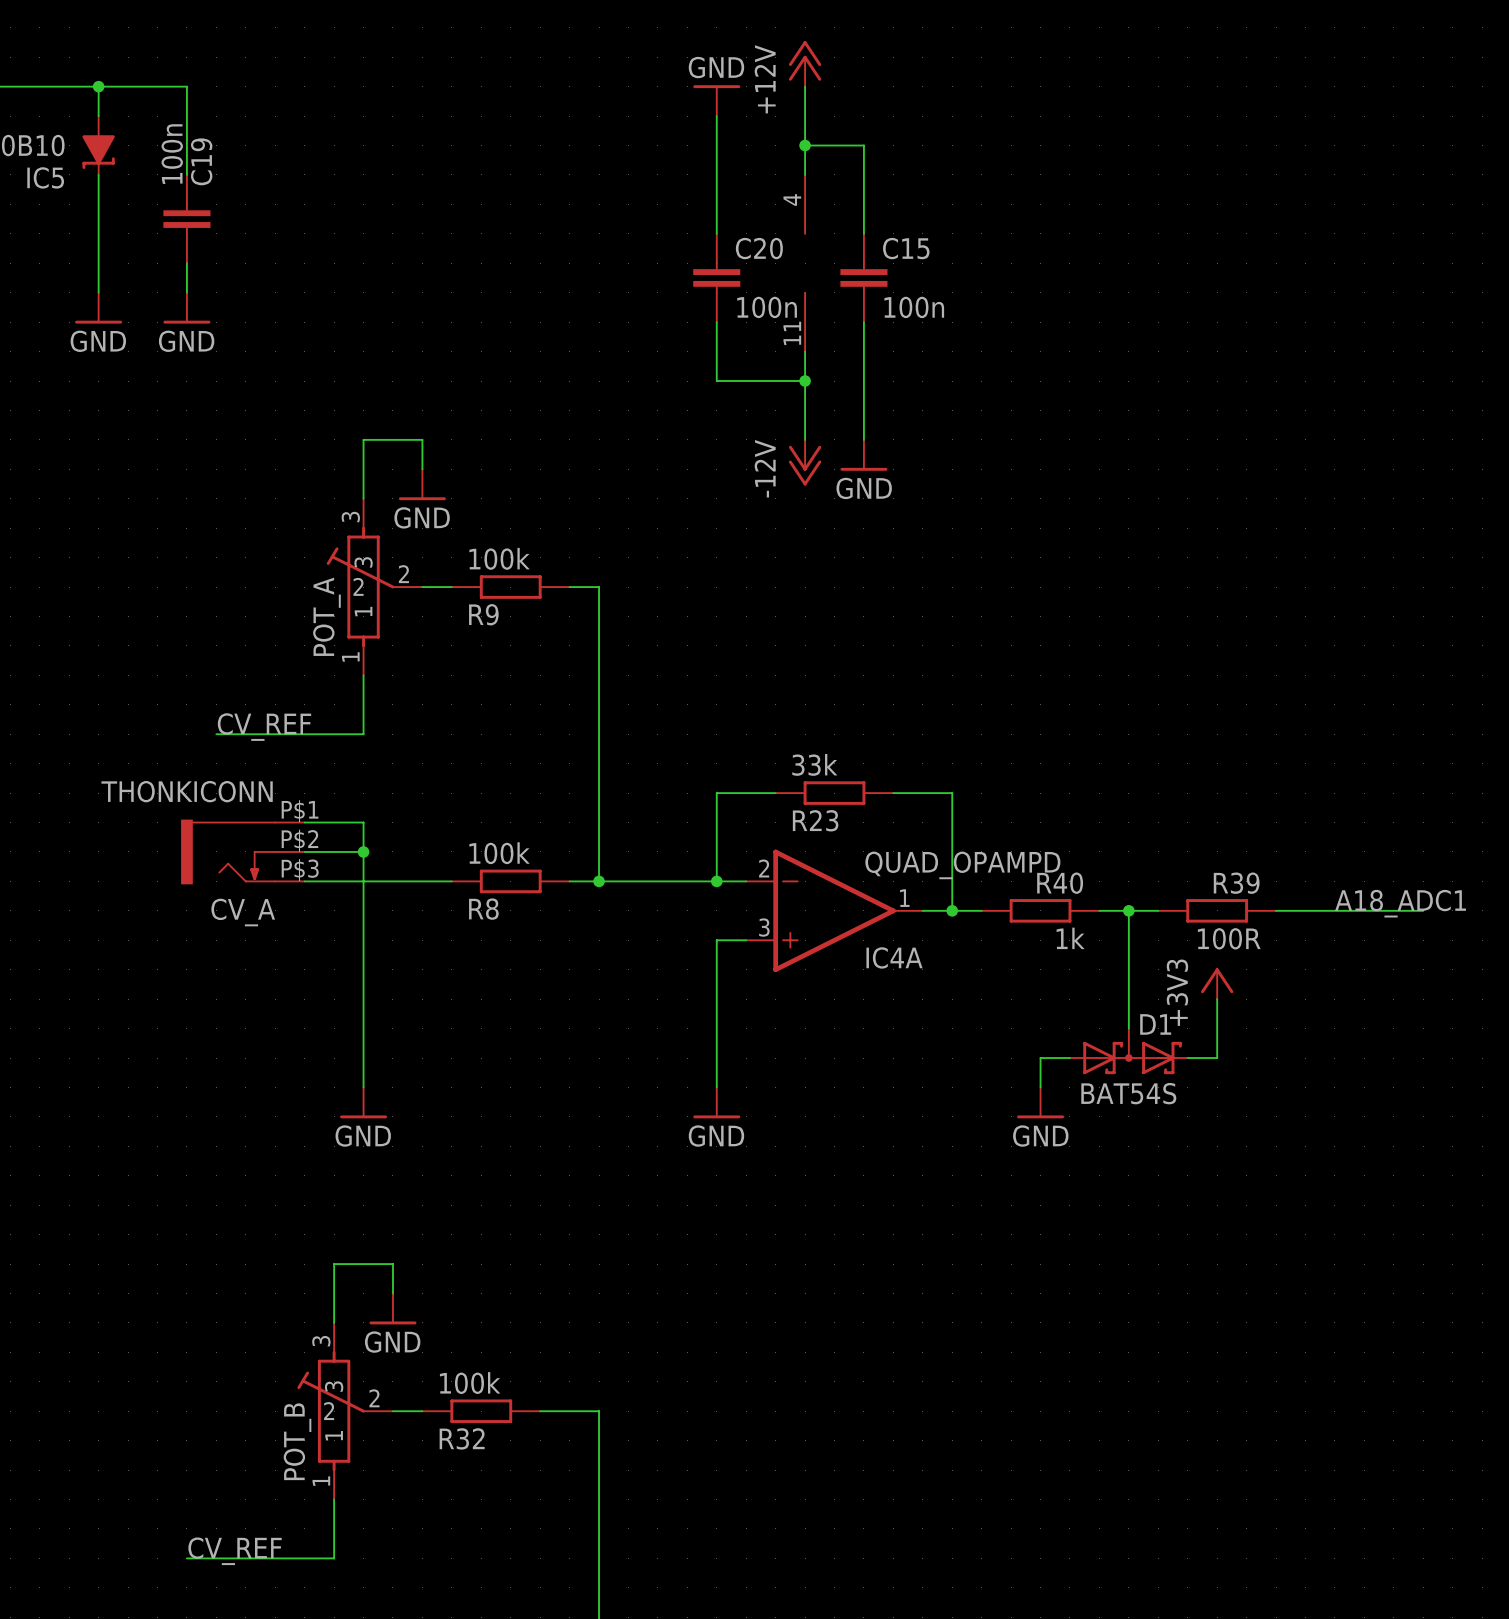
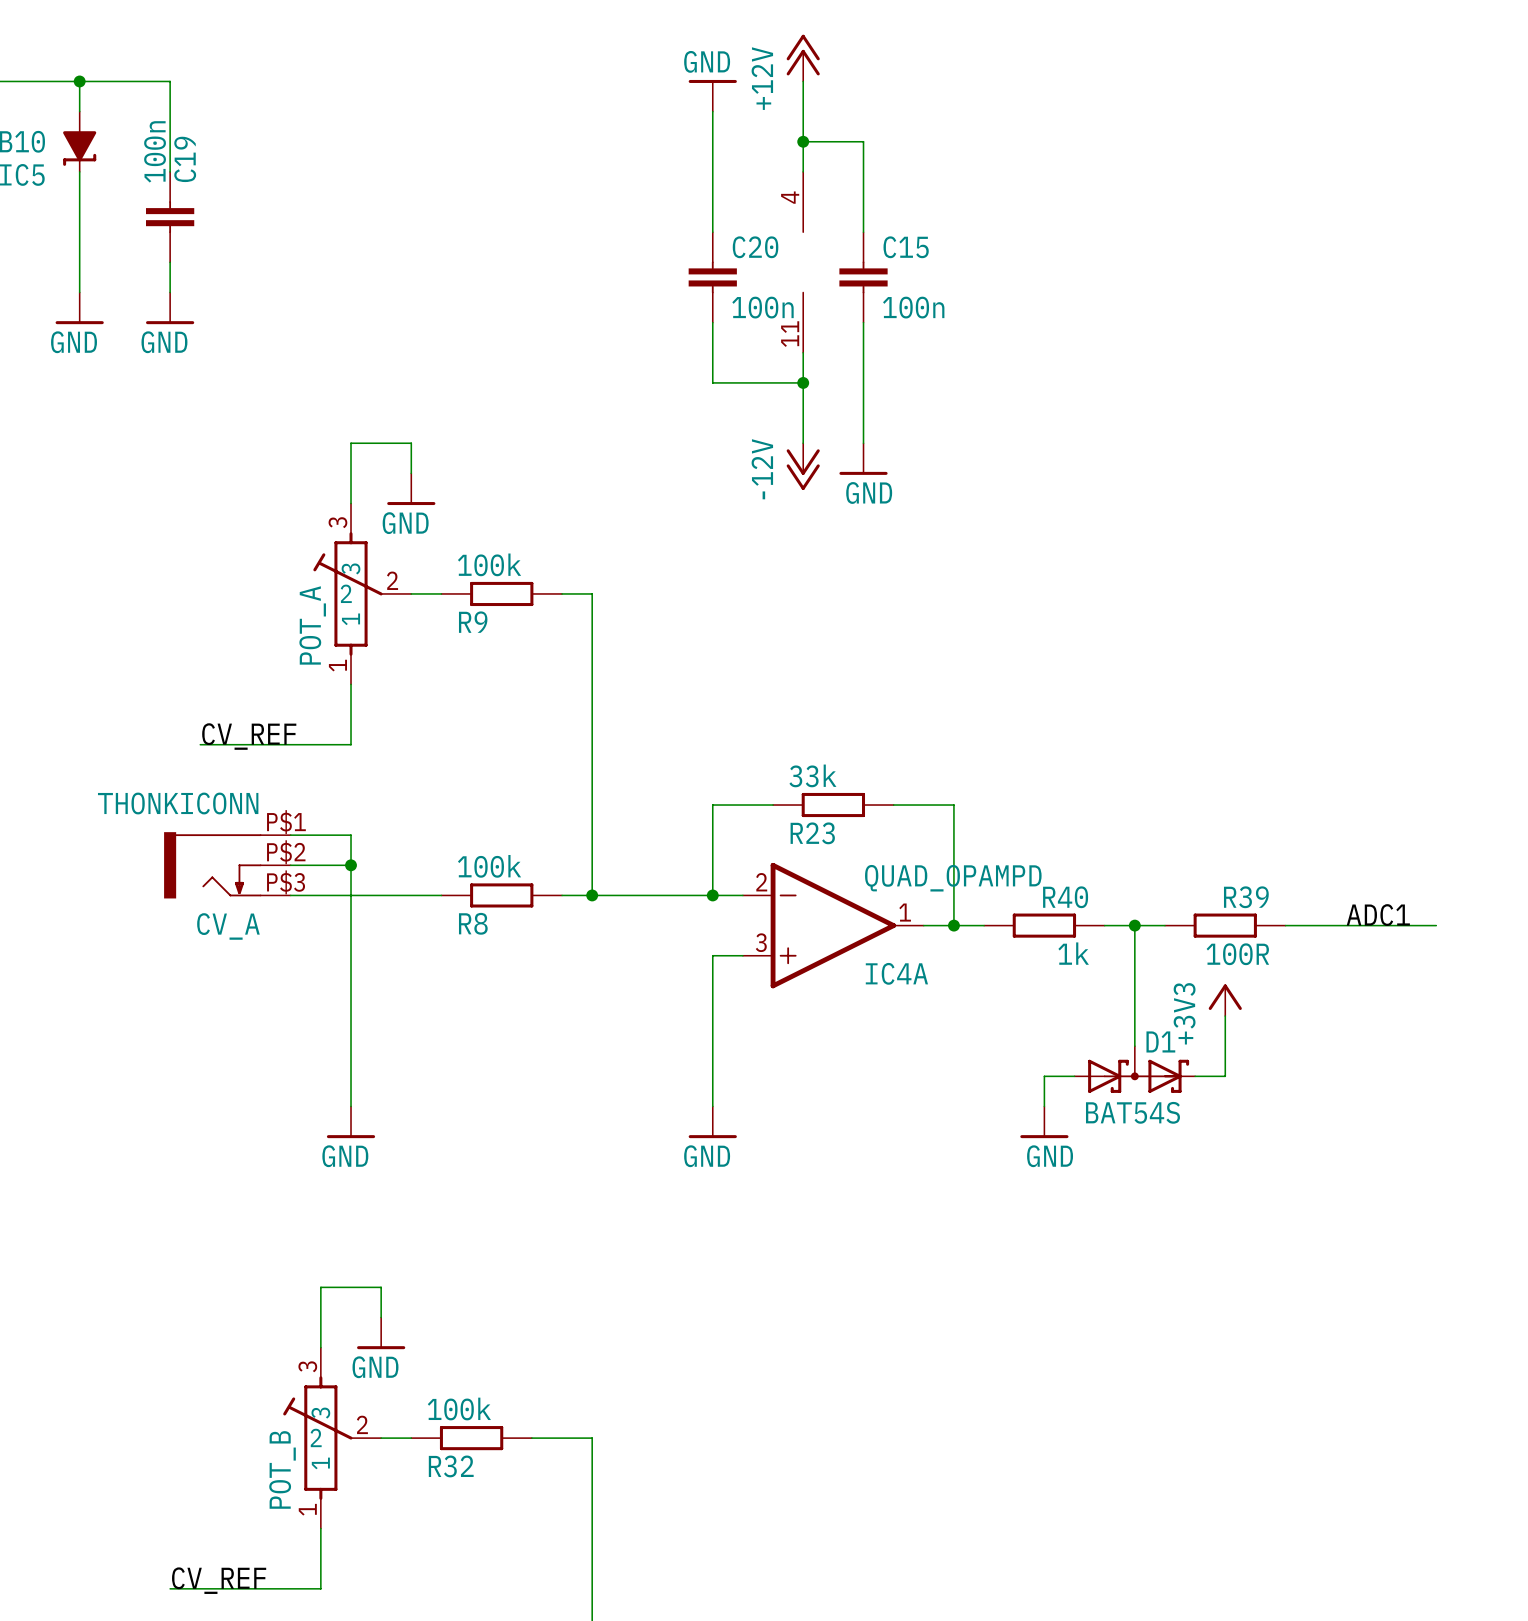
label: A18_ADC1 (1400, 903) -> ADC1 (1378, 915)

